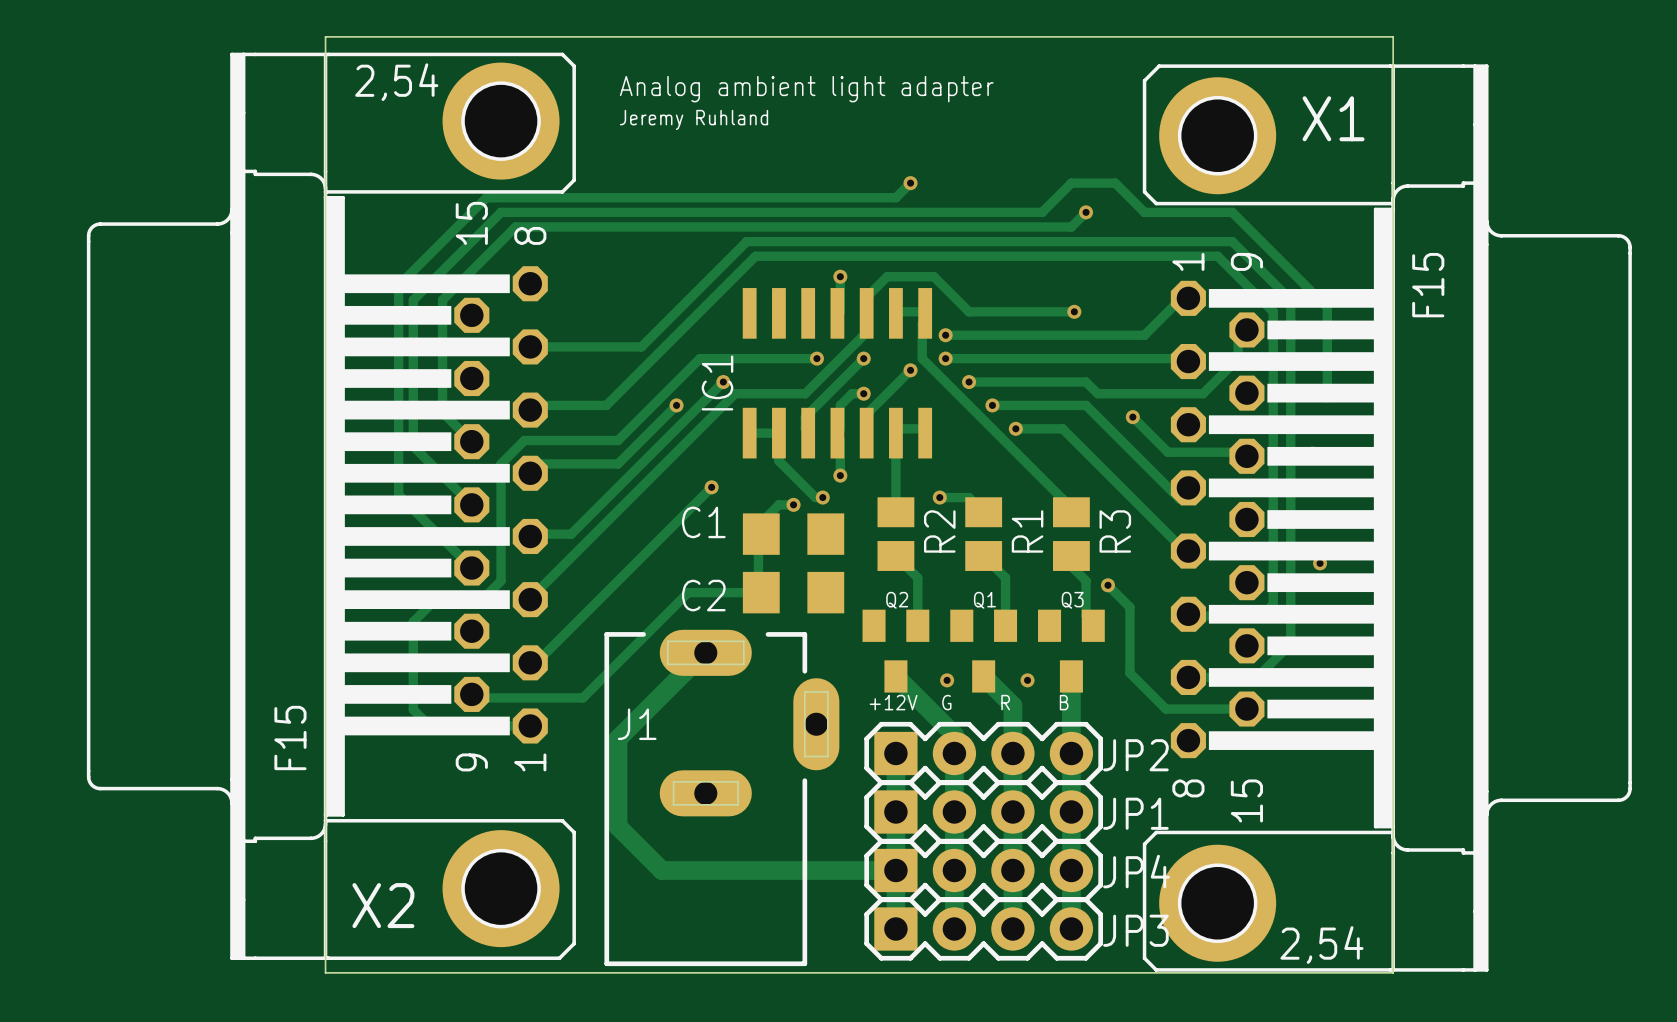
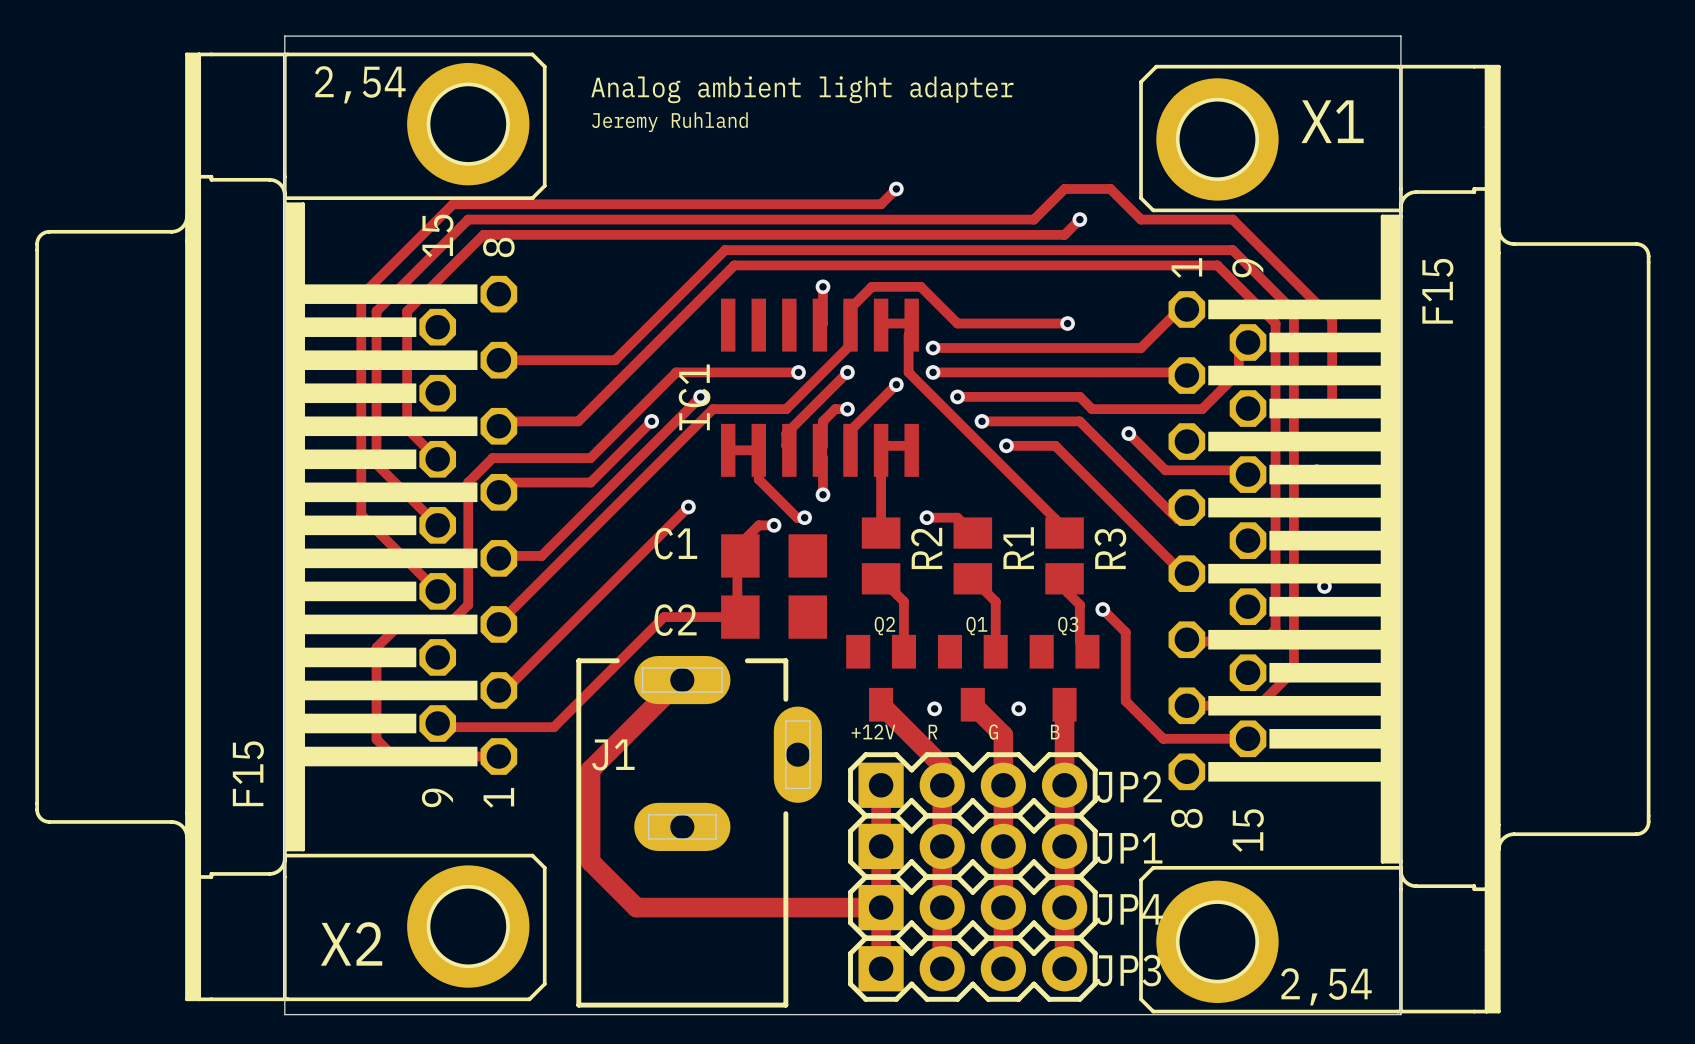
text: G (946, 702) -> R (933, 732)
text: R (1005, 702) -> G (993, 732)

